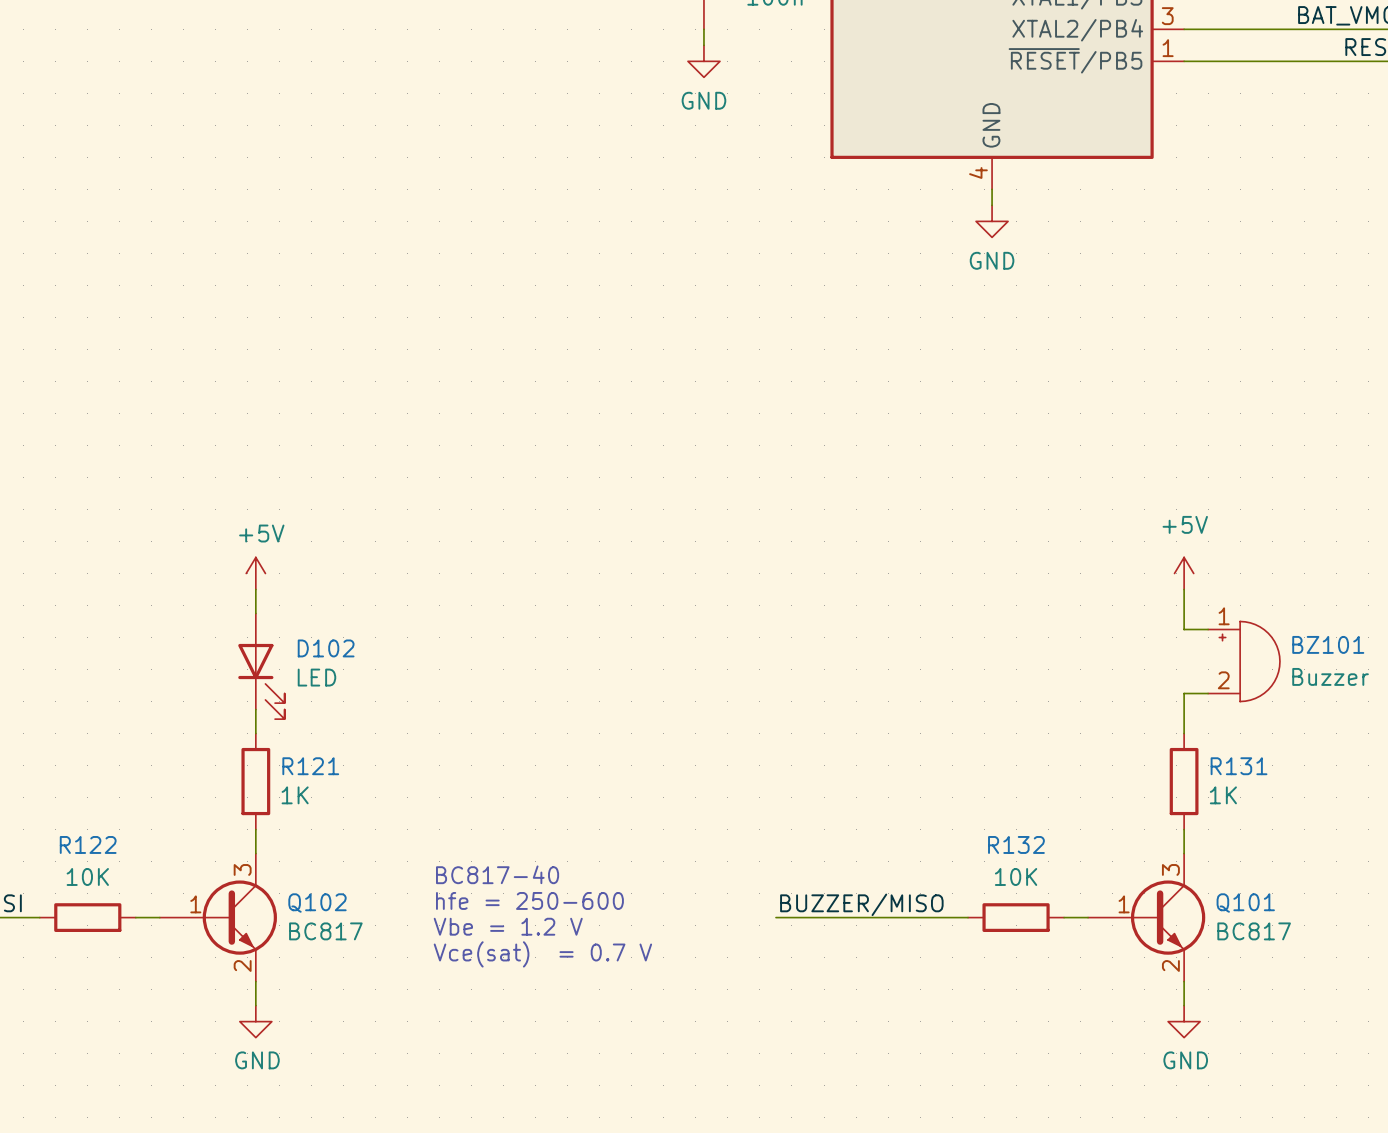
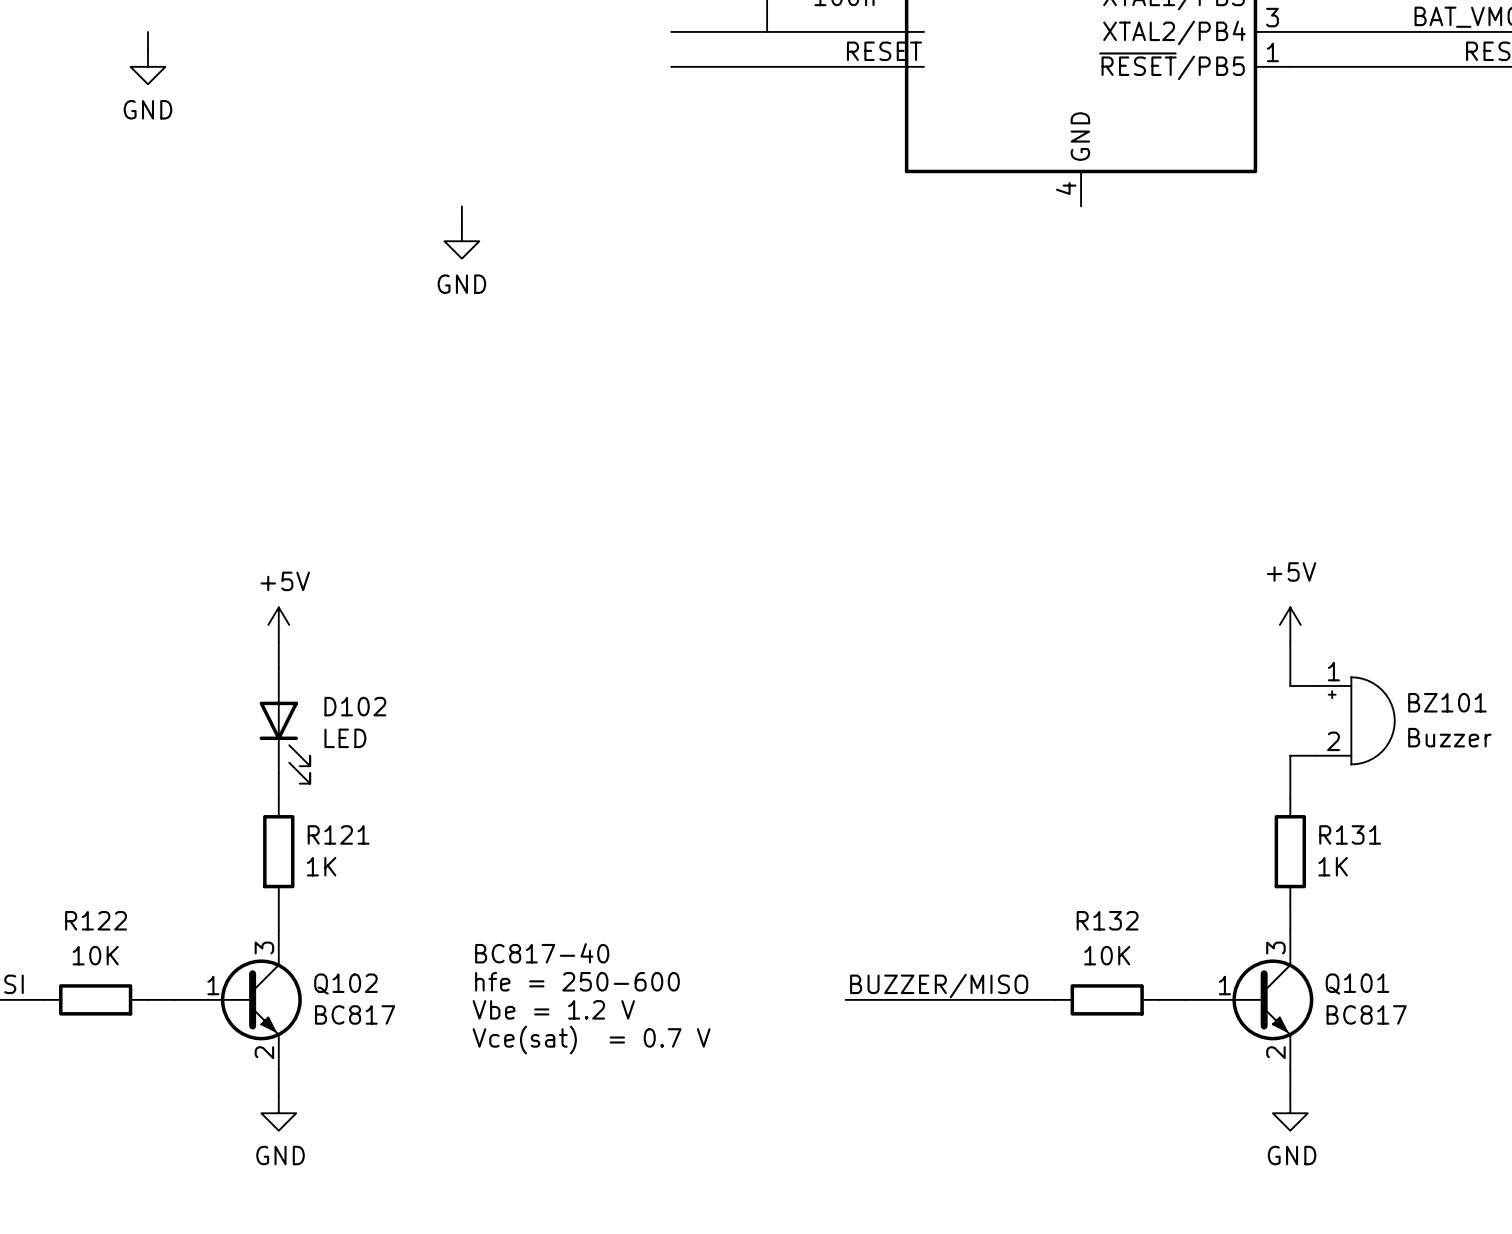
wire: none -> (147, 31) (147, 49)
wire: none -> (671, 31) (924, 31)
wire: (703, 29) (703, 45) -> none
label: none -> RESET (884, 51)
power symbol: none -> GND (147, 66)
wire: none -> (671, 66) (924, 66)
power symbol: GND (703, 61) -> none
wire: none -> (461, 206) (461, 223)
wire: (992, 189) (992, 205) -> none
power symbol: none -> GND (461, 241)
power symbol: GND (992, 221) -> none

